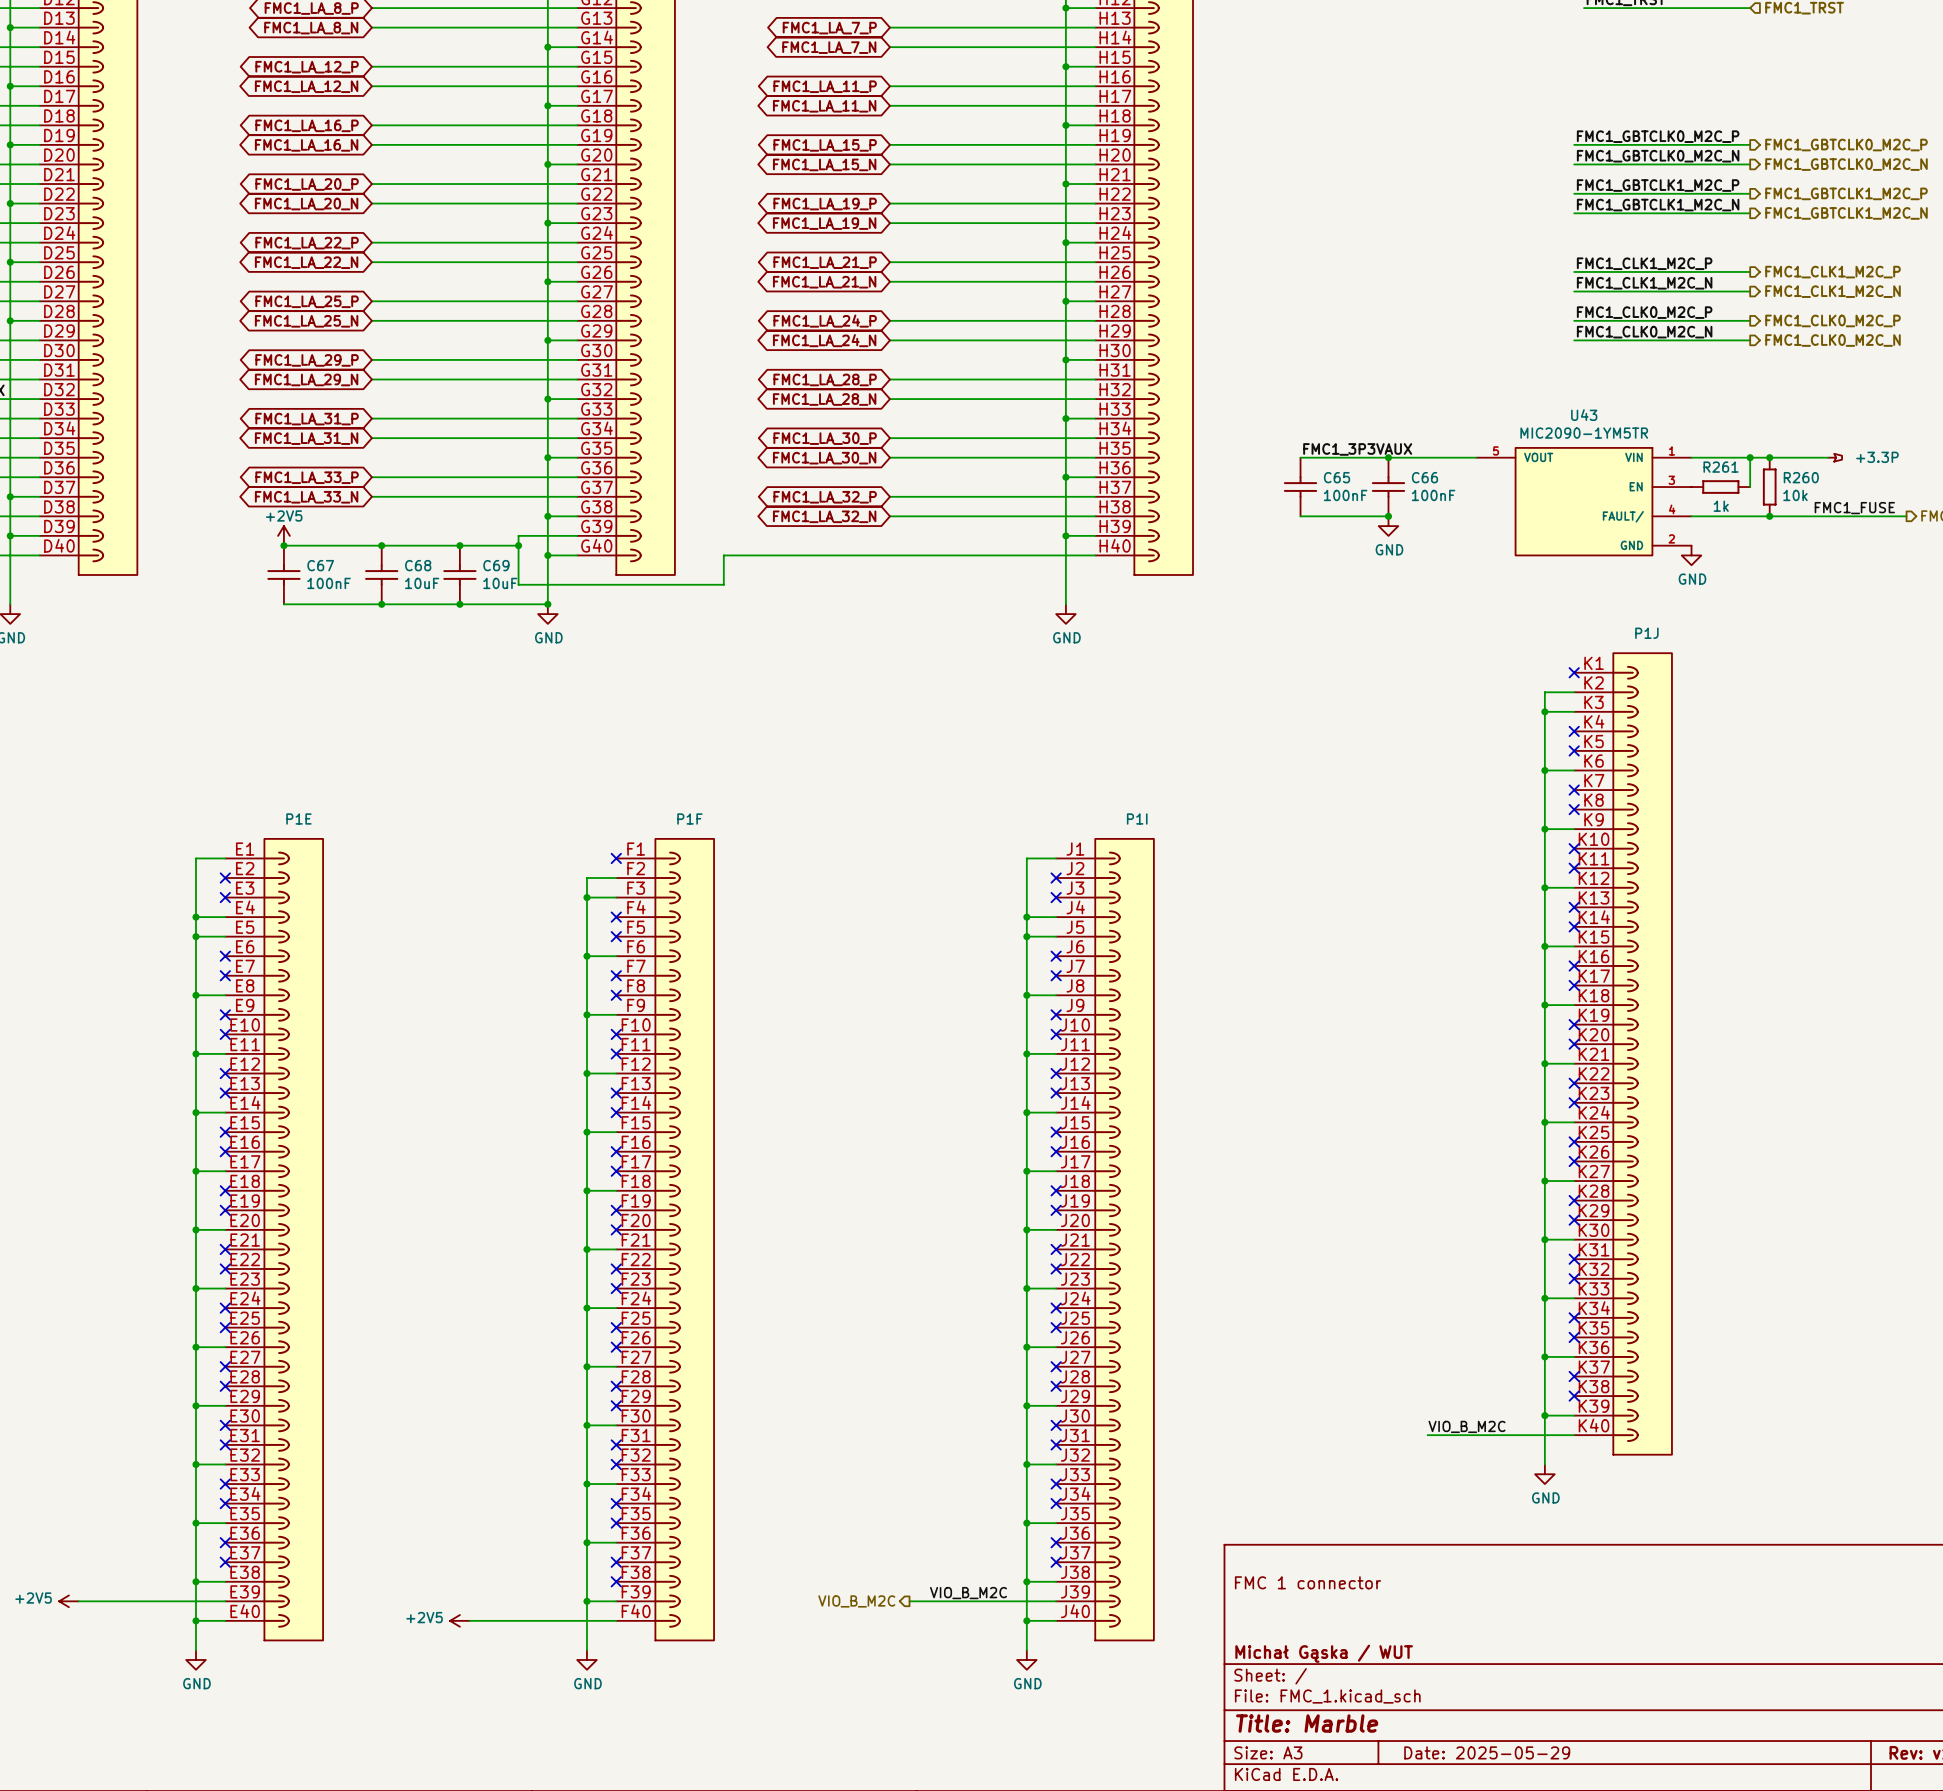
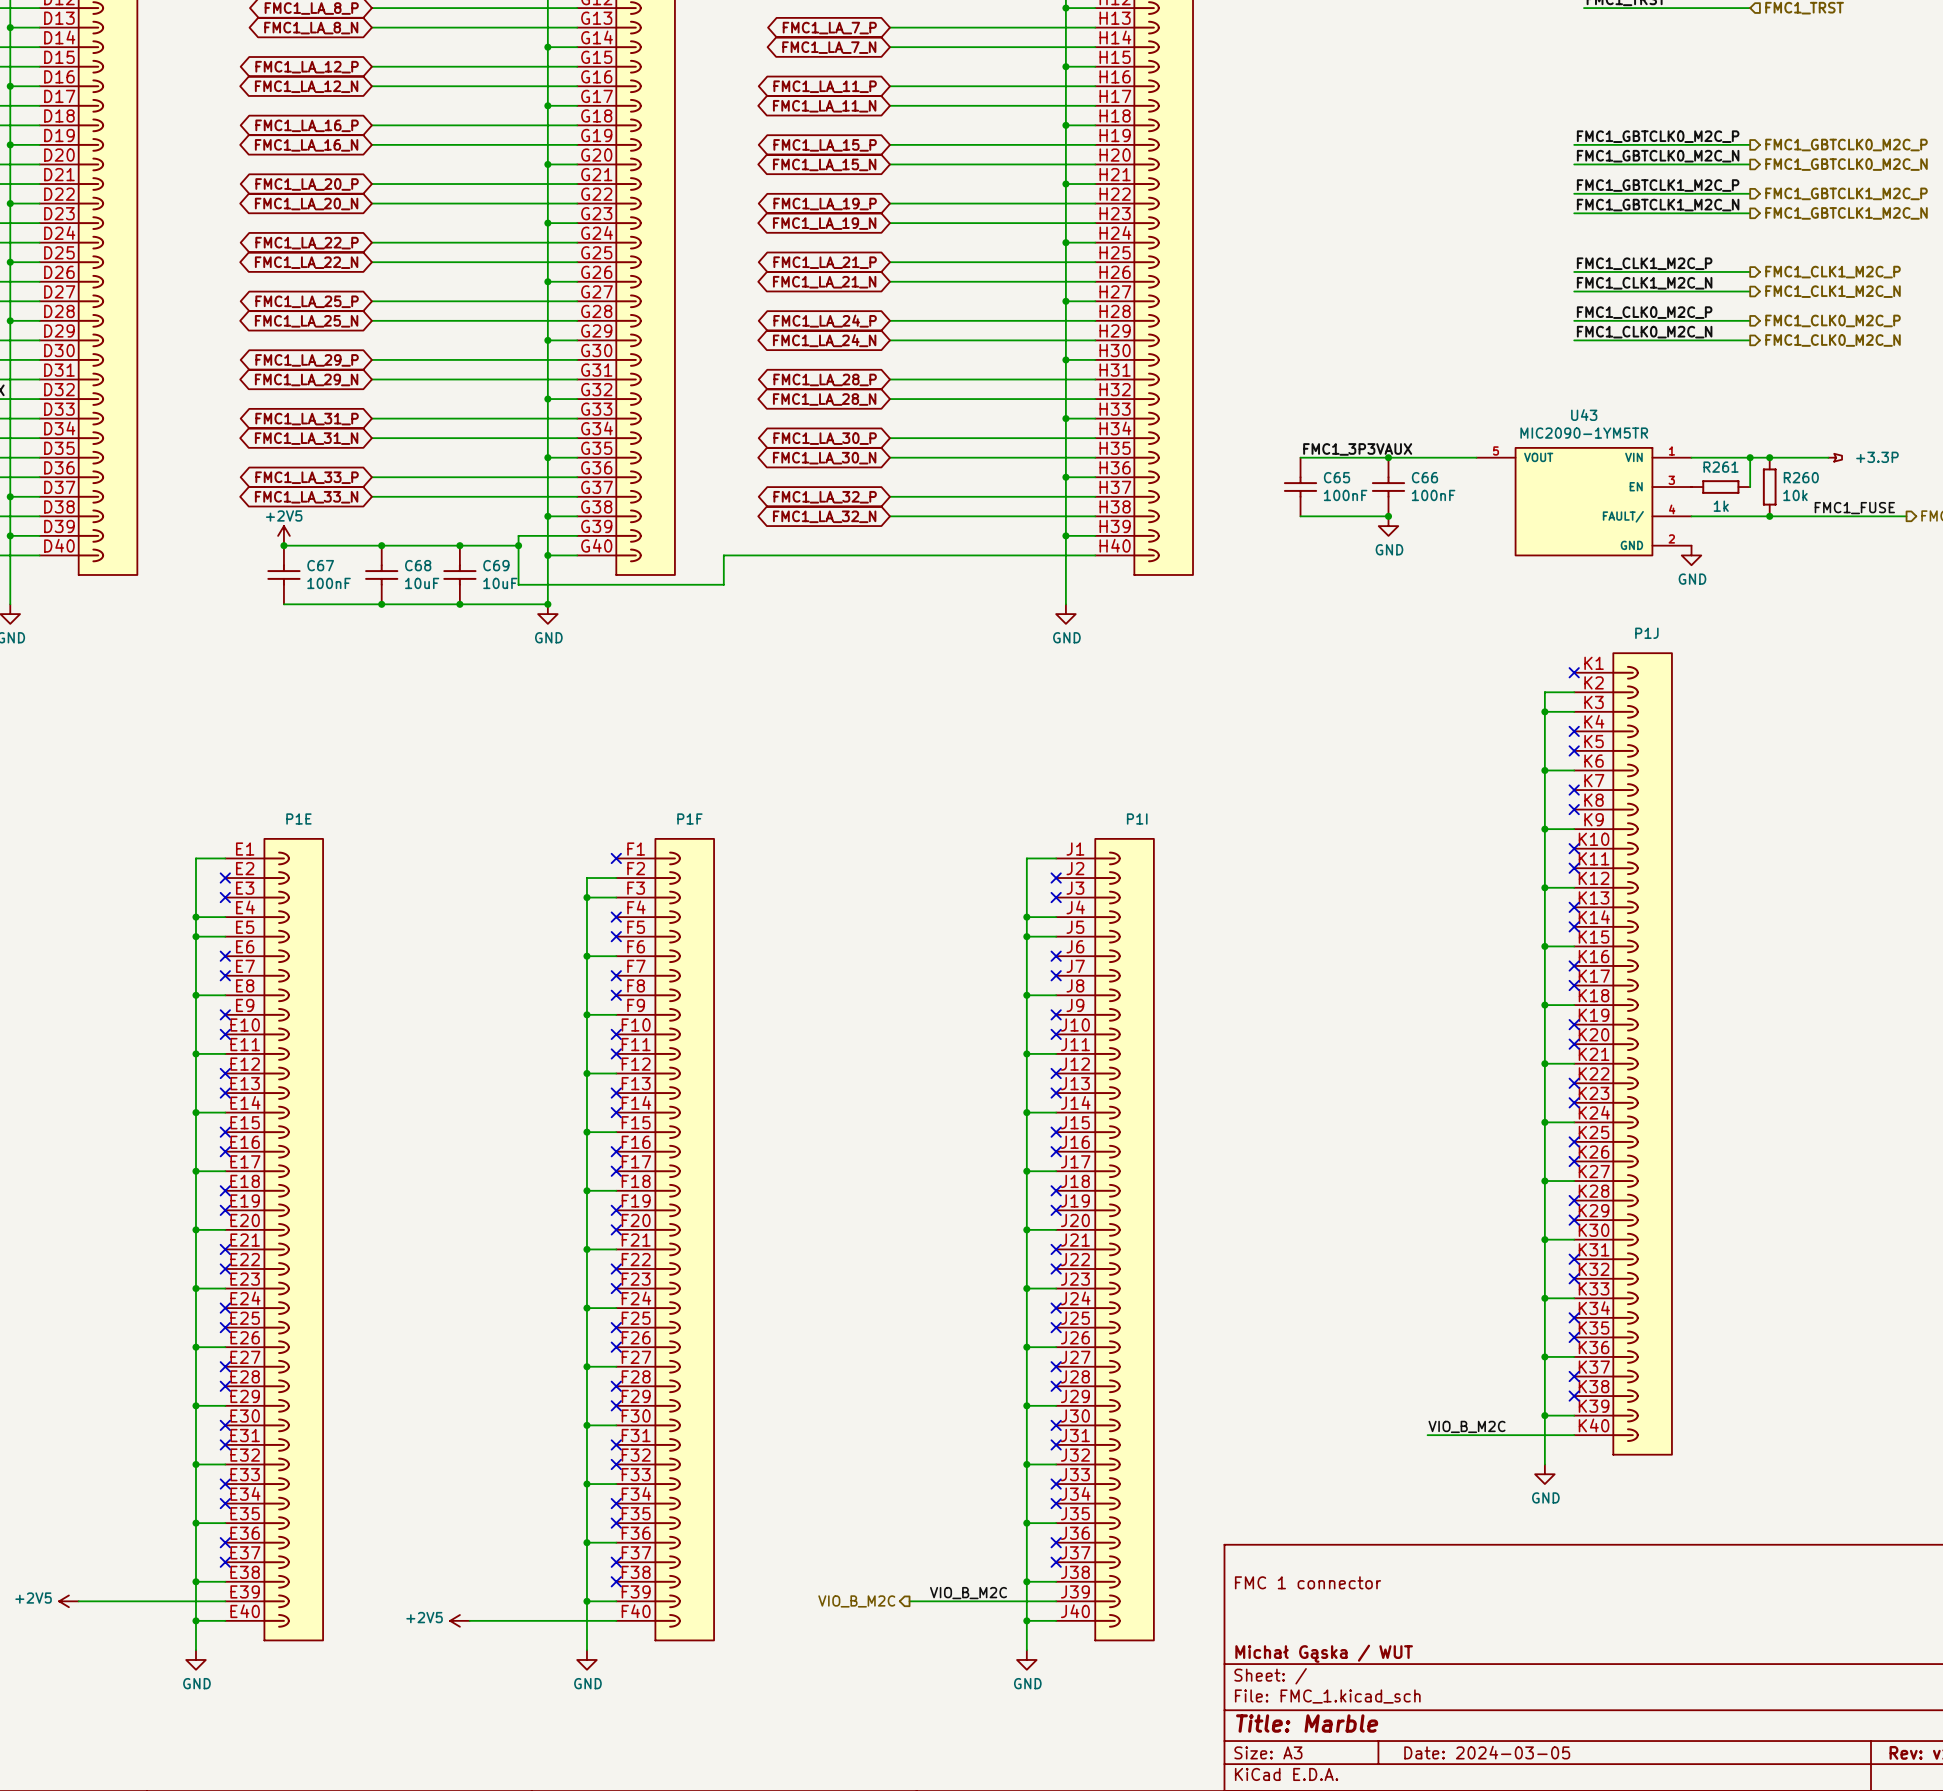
title block: Date: 2025-05-29 (1487, 1752) -> Date: 2024-03-05 (1487, 1752)

